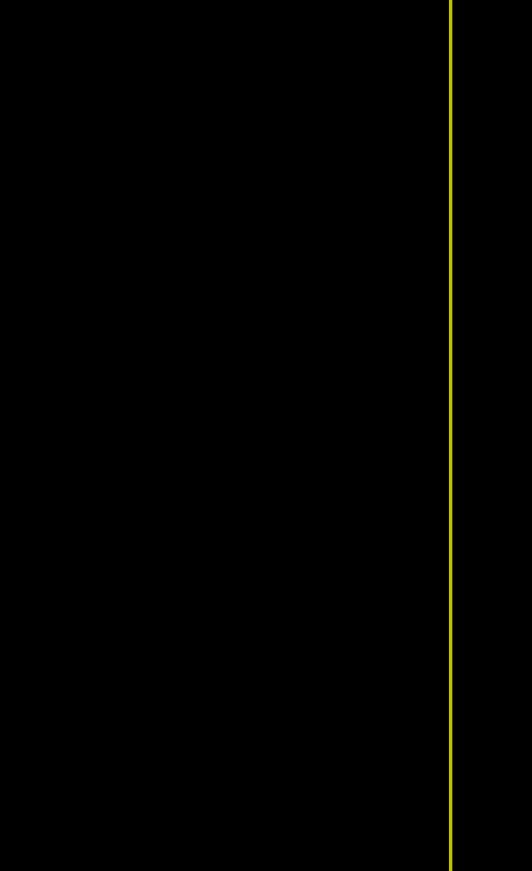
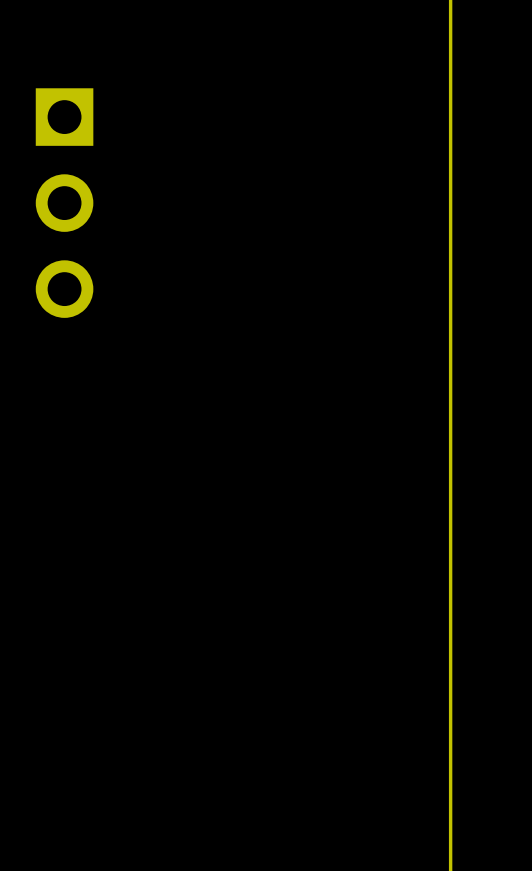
part: none -> (64, 203)

